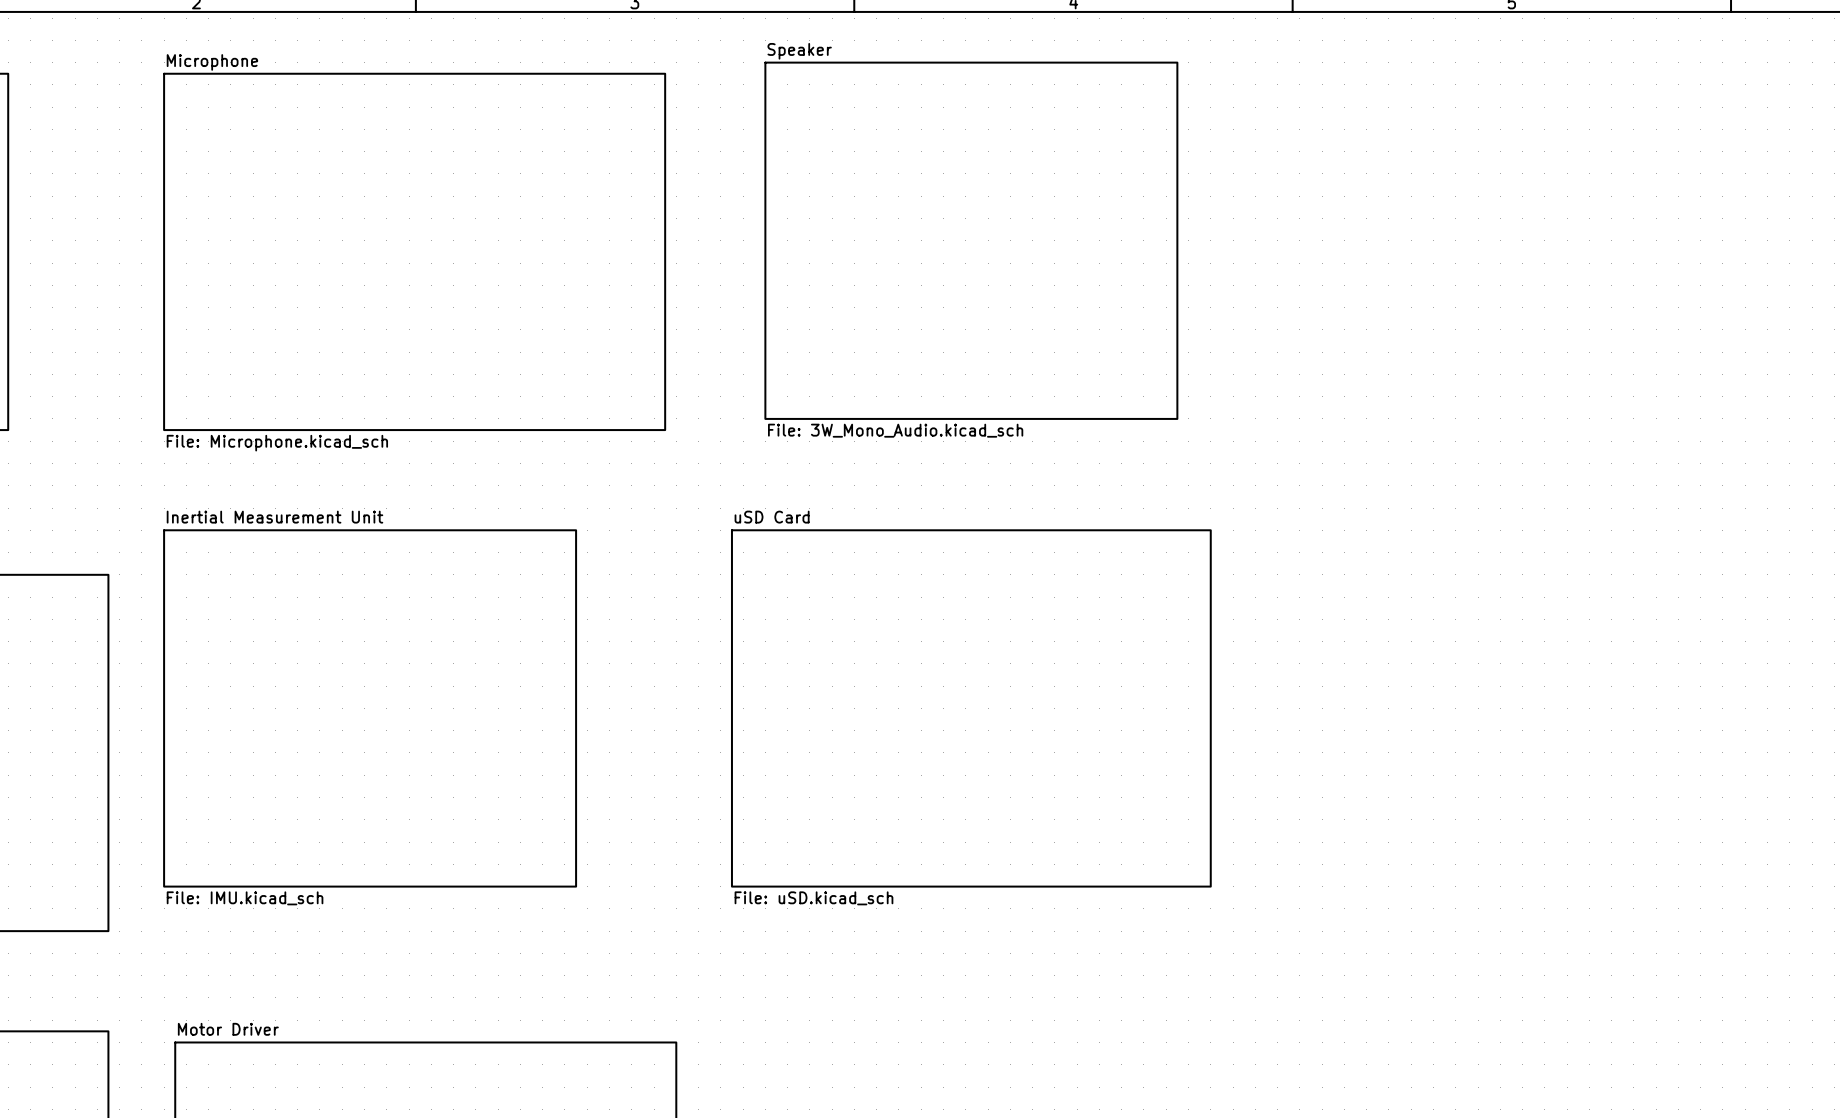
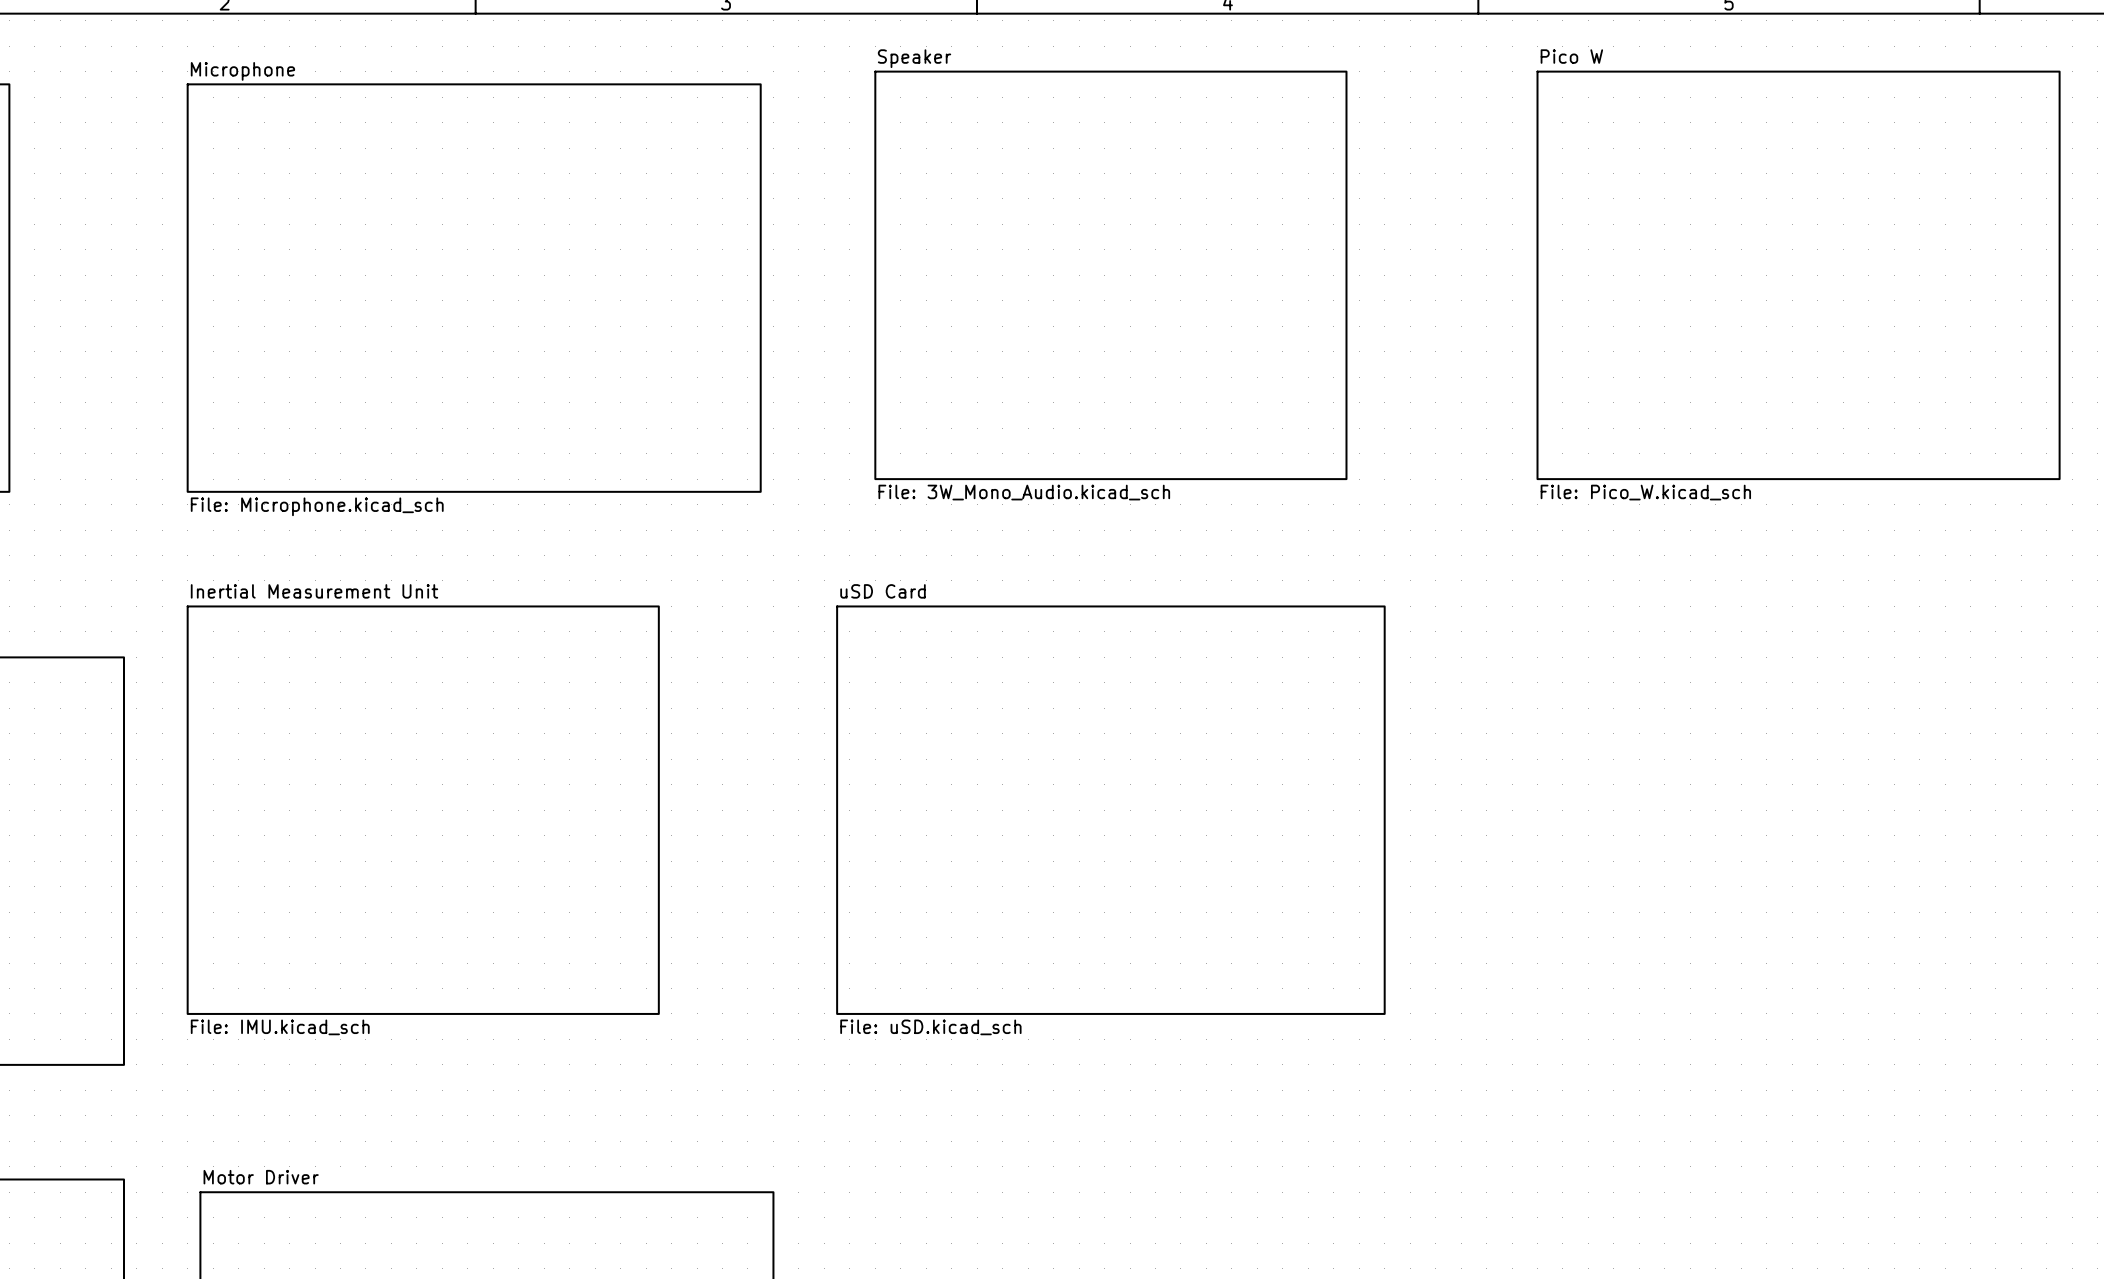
sheet Pico W: none -> File: Pico_W.kicad_sch (1798, 275)

